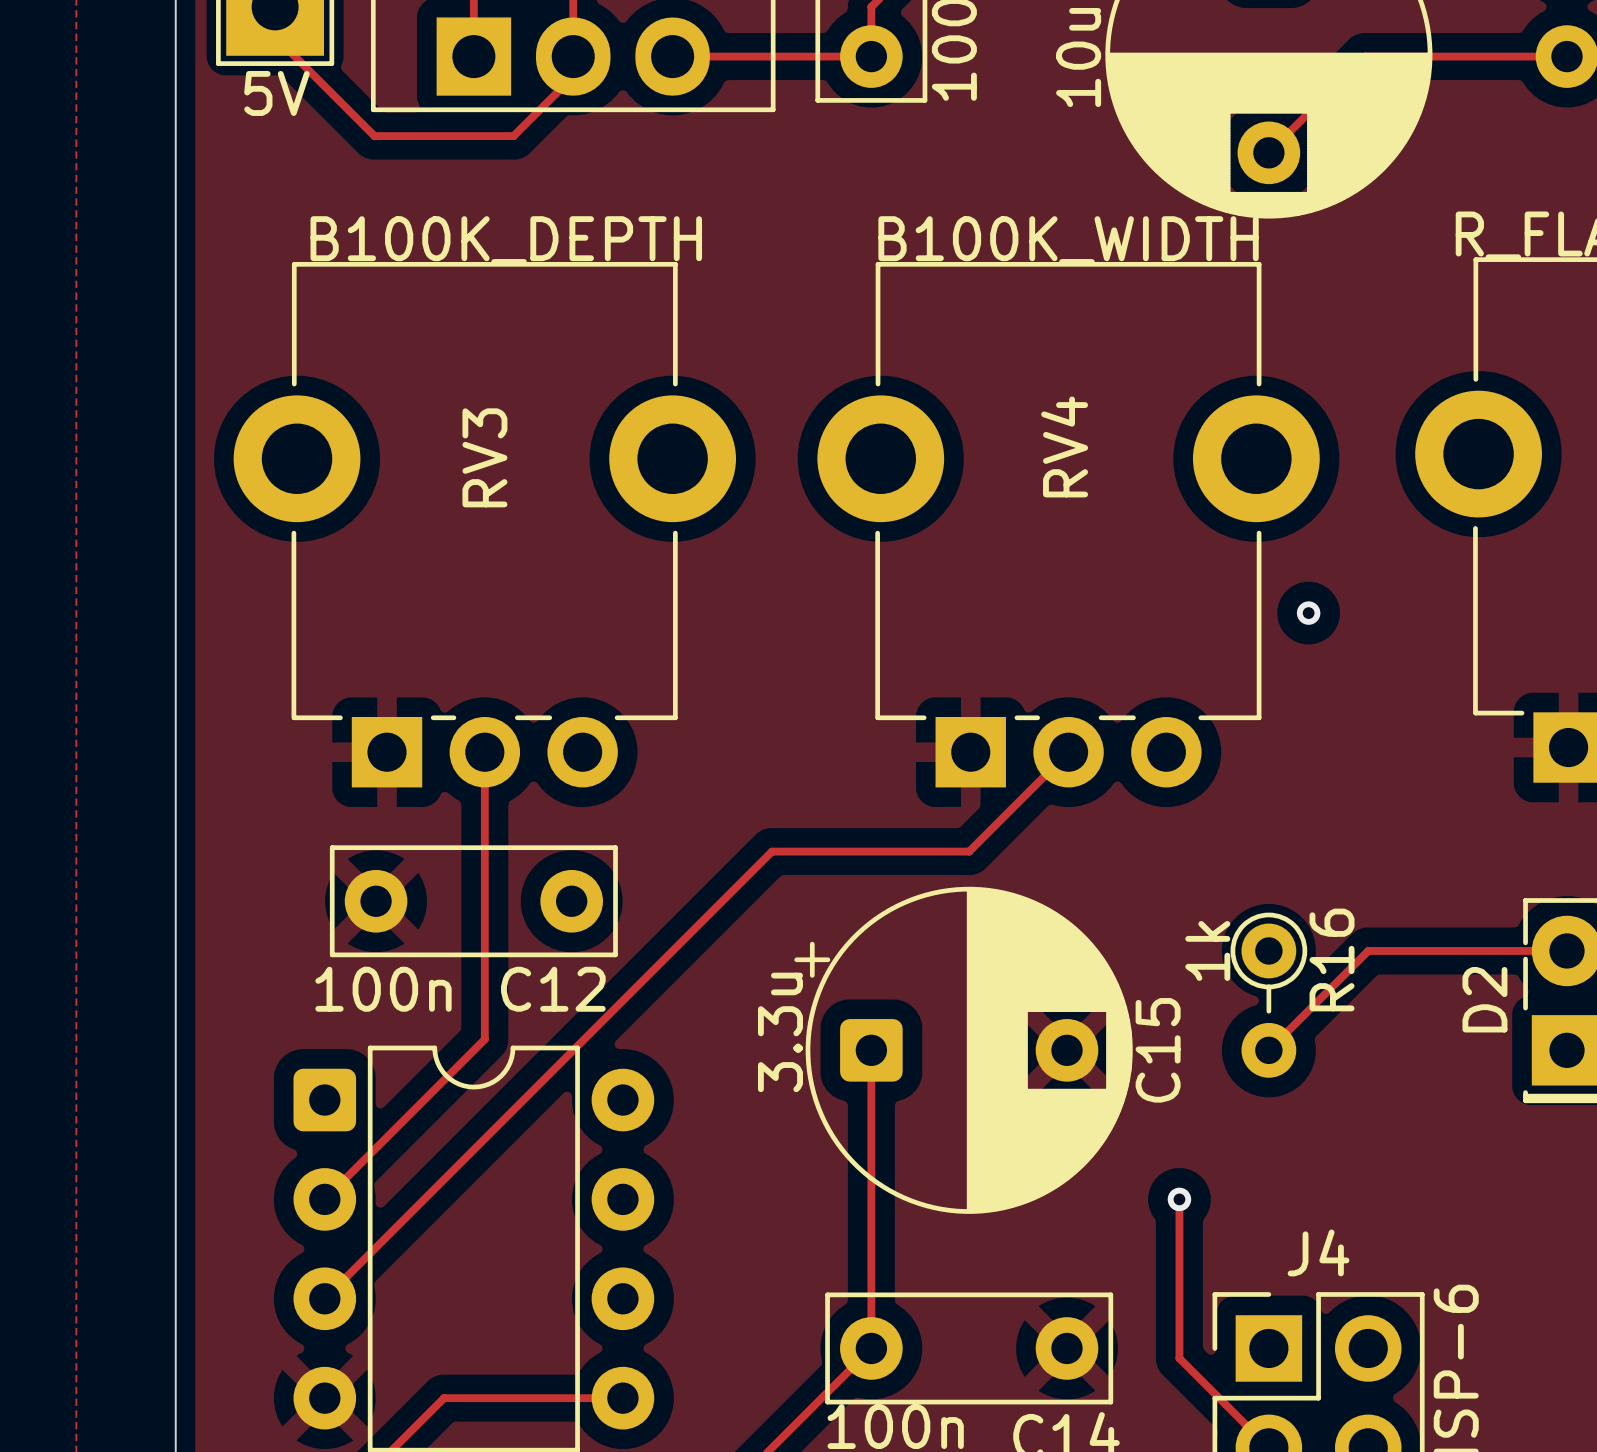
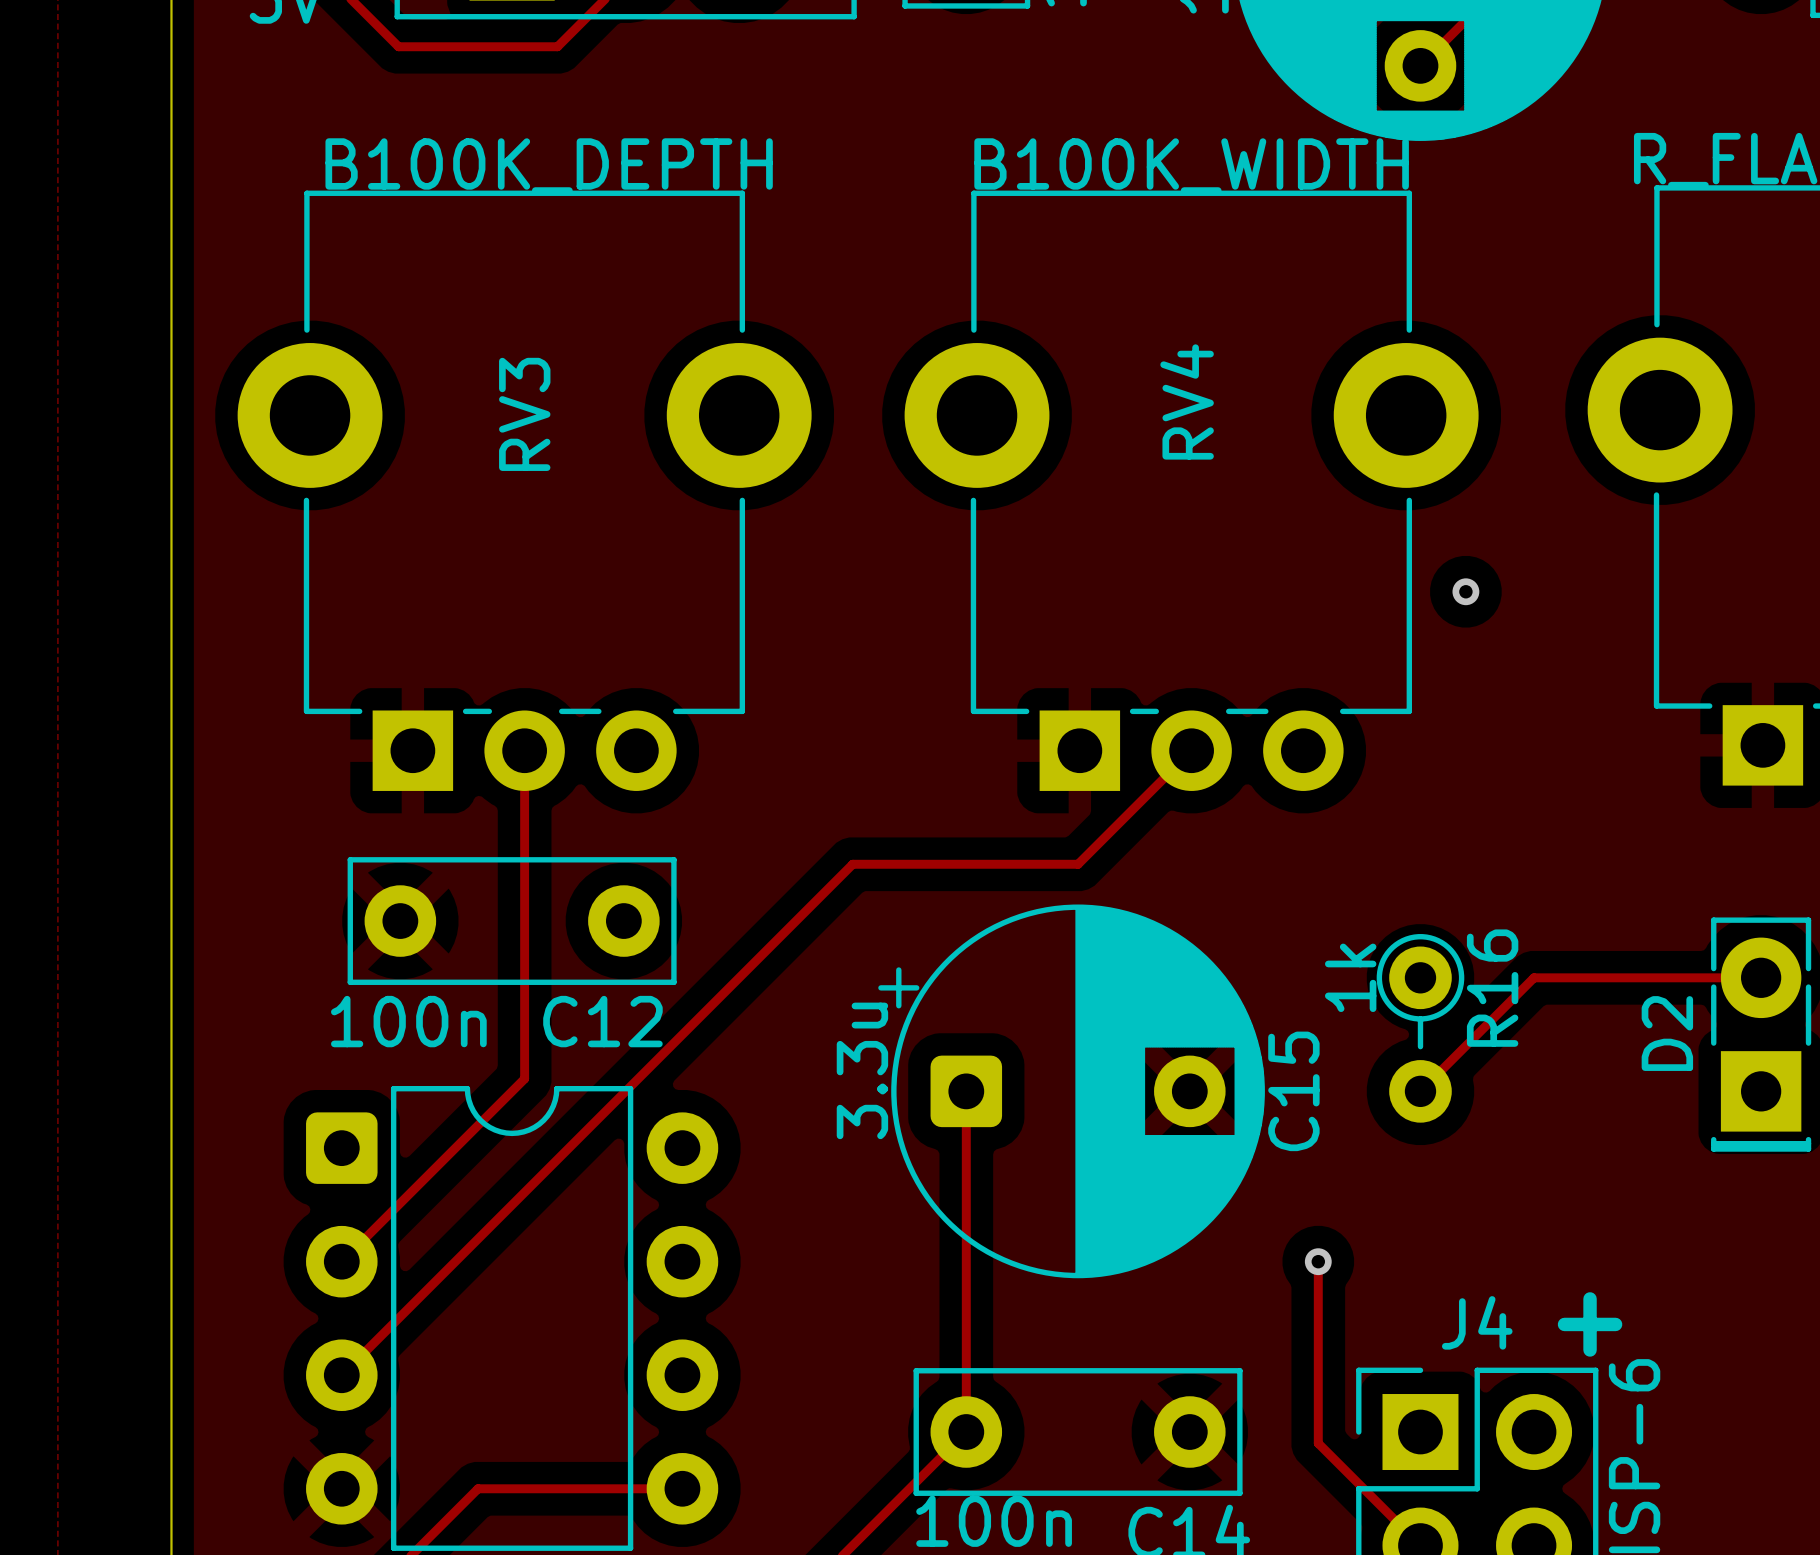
text: none -> + (1590, 1324)

